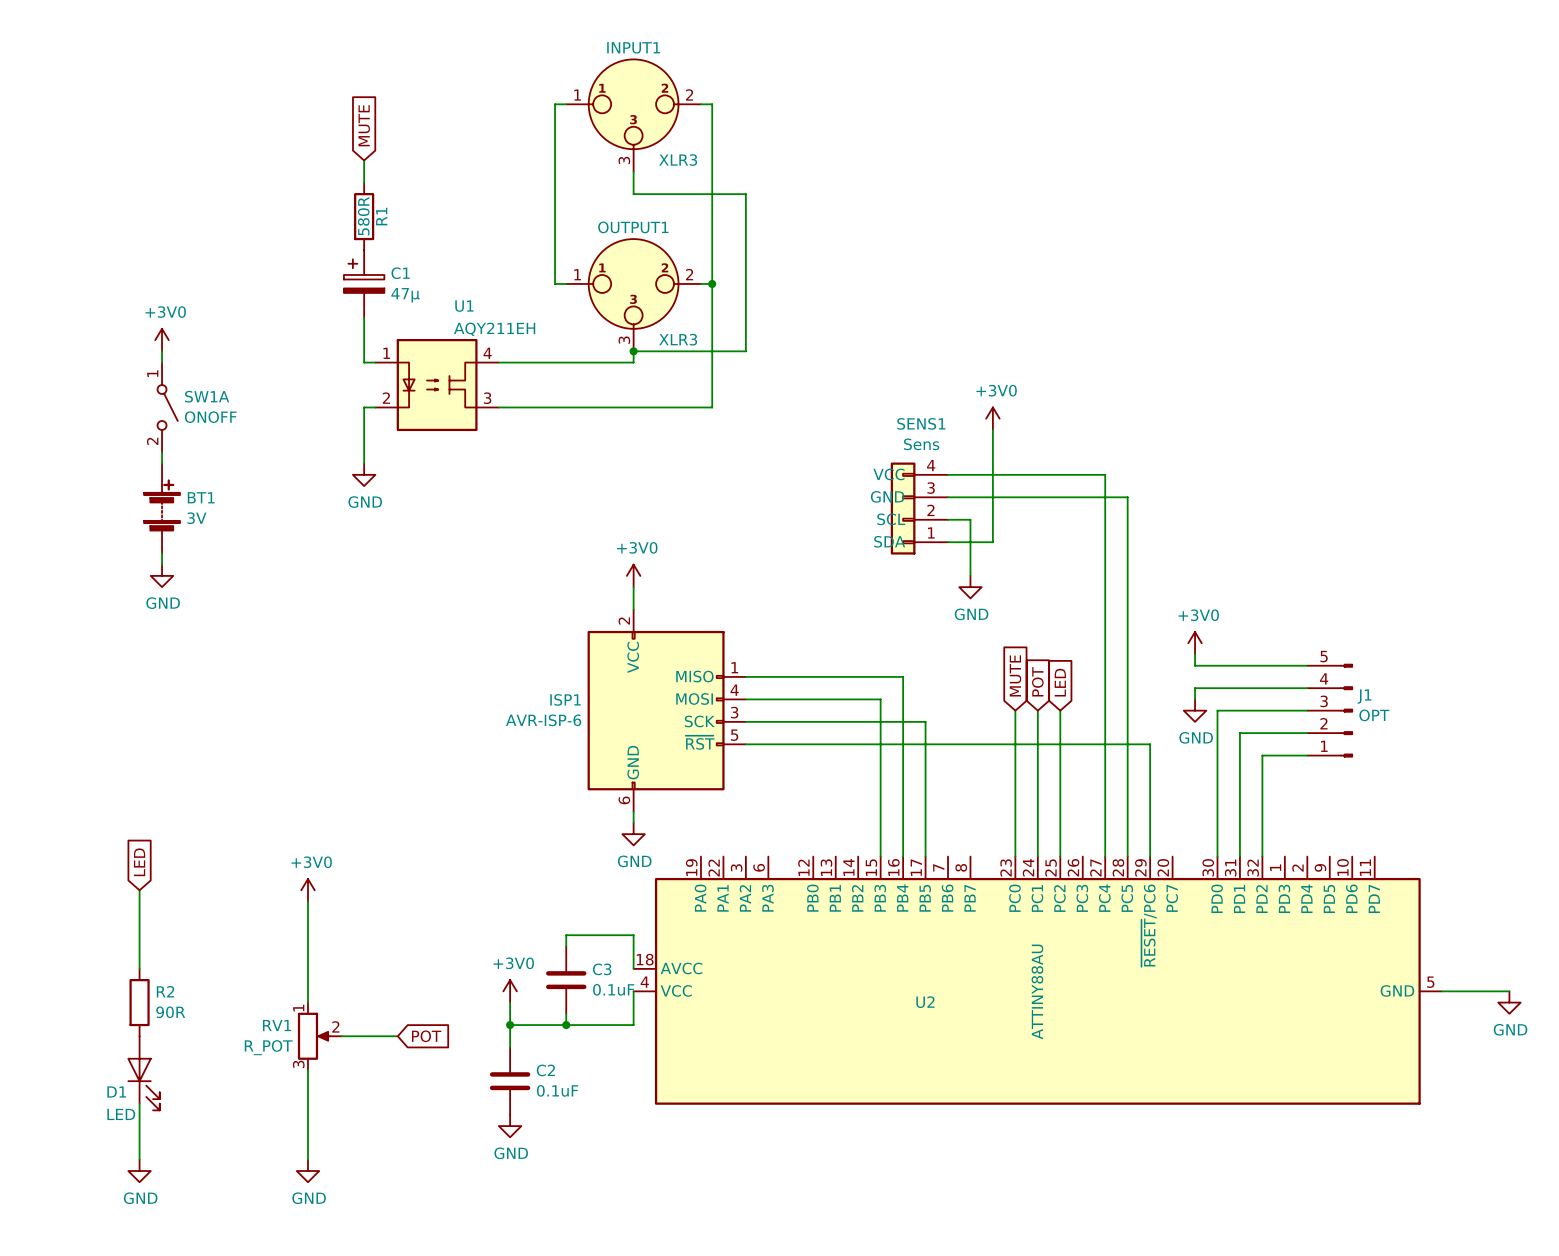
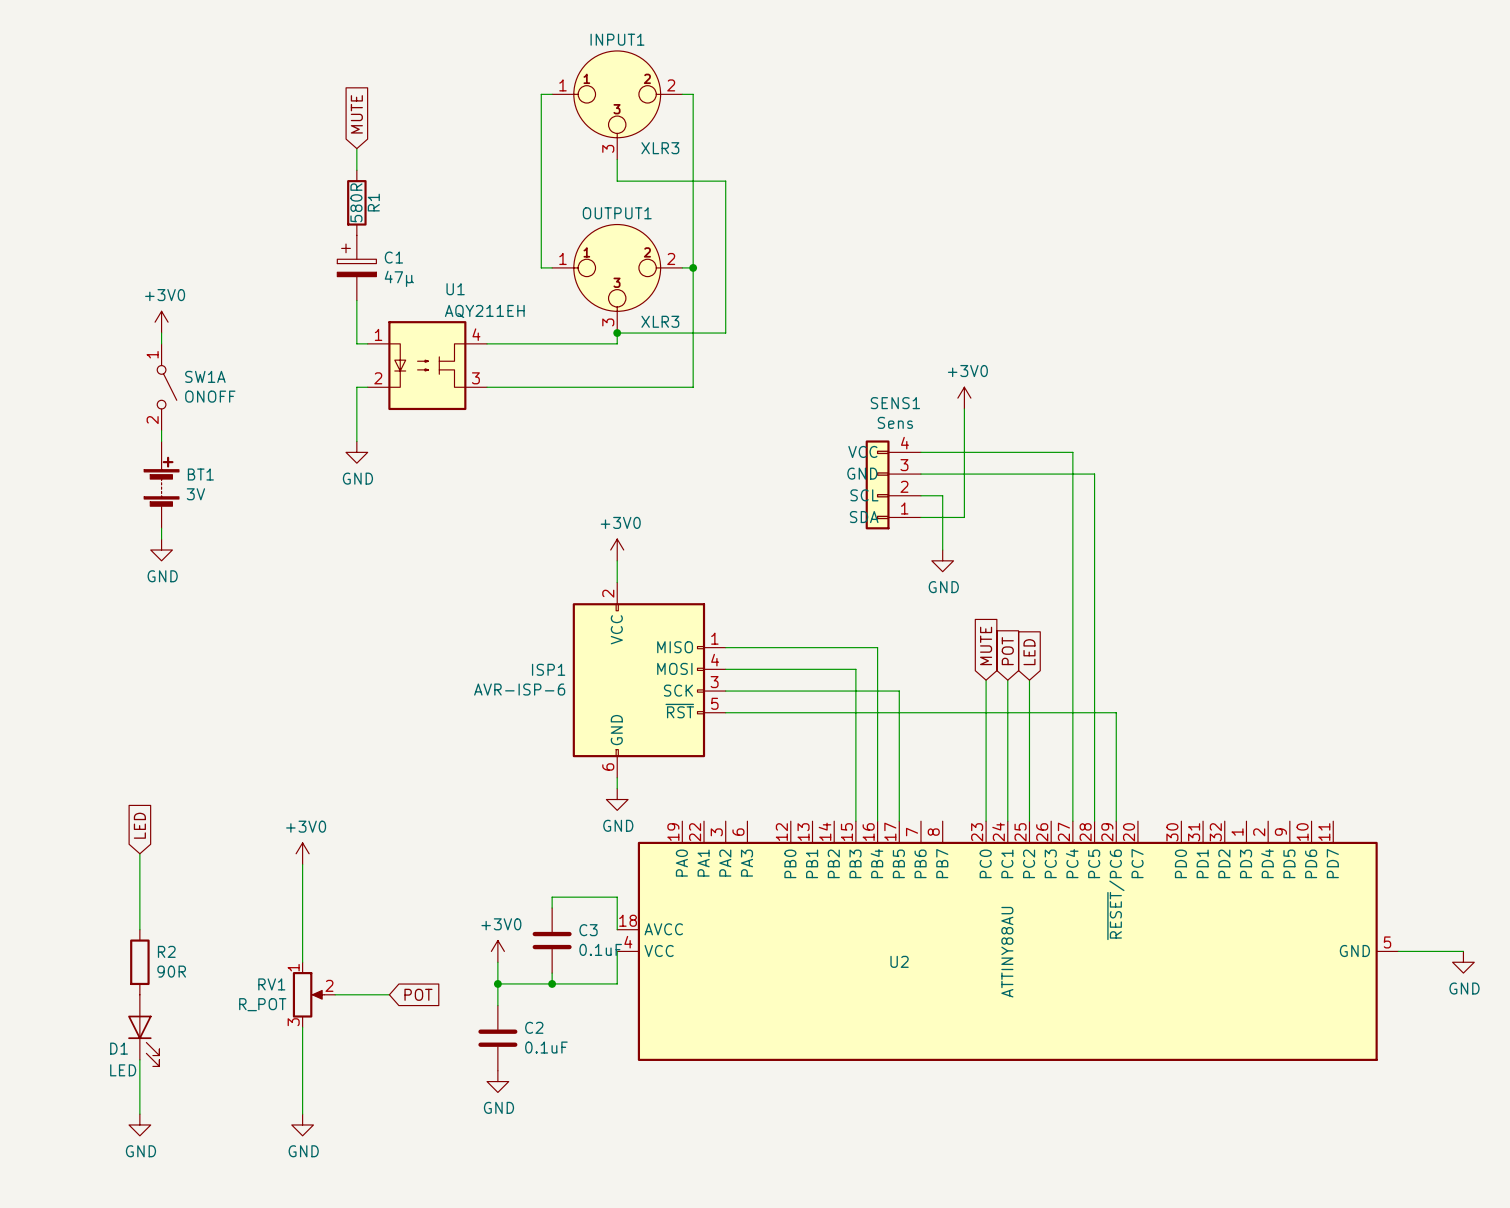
power symbol: +3V0 (1195, 643) -> none
wire: (1195, 654) (1195, 665) (1307, 665) -> none
wire: (1307, 688) (1195, 688) (1195, 699) -> none
power symbol: GND (1195, 710) -> none
wire: (1307, 710) (1217, 710) (1217, 856) -> none
J1: OPT (1330, 710) -> none
wire: (1307, 733) (1239, 733) (1239, 856) -> none
wire: (1307, 755) (1262, 755) (1262, 856) -> none

